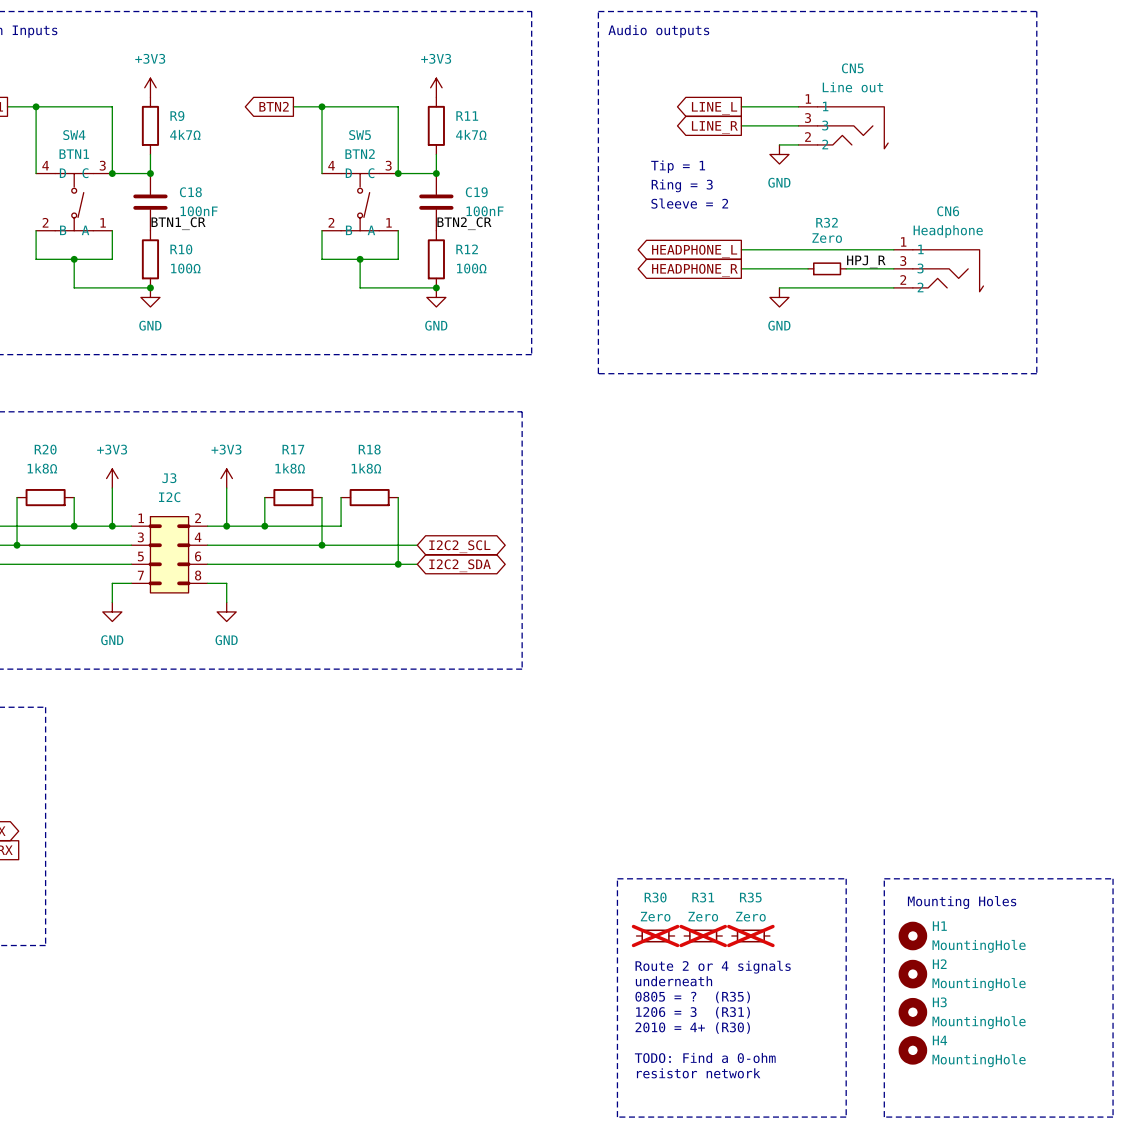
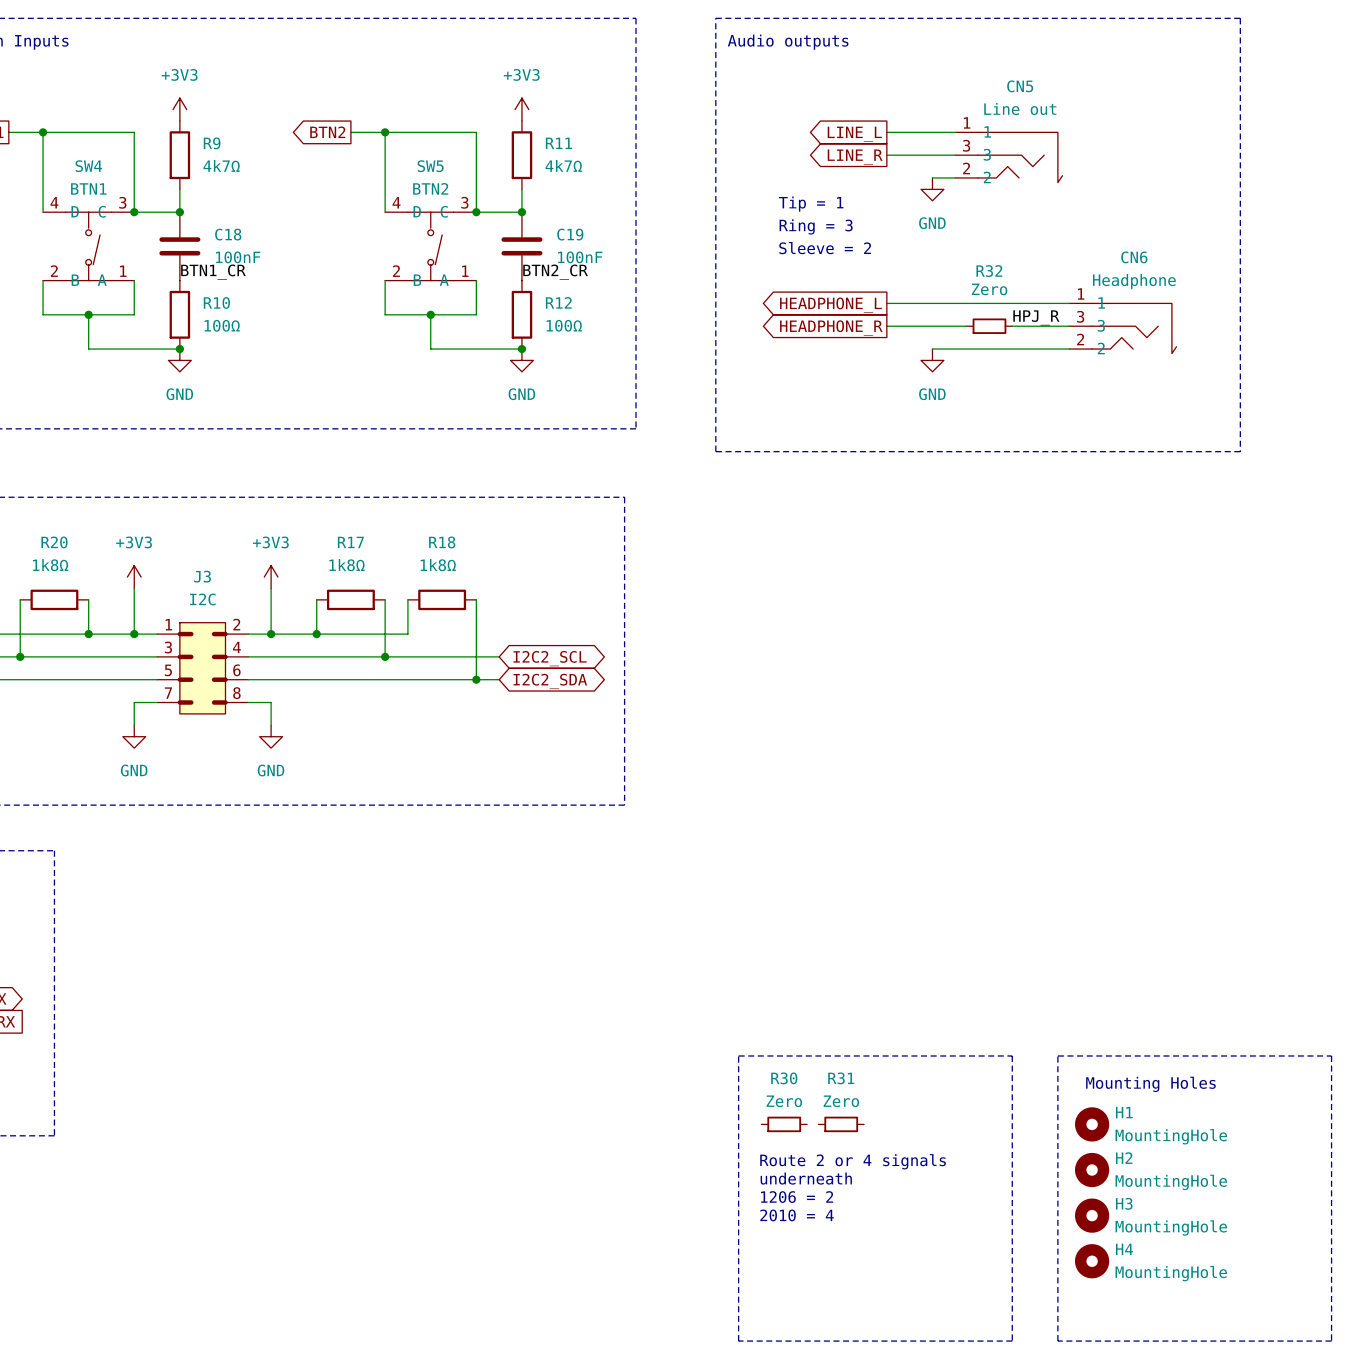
R30 do-not-place cross: (655, 935) -> none
R31 do-not-place cross: (703, 935) -> none
R35: Zero (750, 935) -> none
text: 0805 = ? (R35) (692, 997) -> 1206 = 2 (797, 1197)
text: 1206 = 3 (R31) (693, 1012) -> 2010 = 4 (797, 1215)
text: 2010 = 4+ (R30) (692, 1028) -> none
text: TODO: Find a 0-ohm (705, 1057) -> none
text: resistor network (698, 1073) -> none

